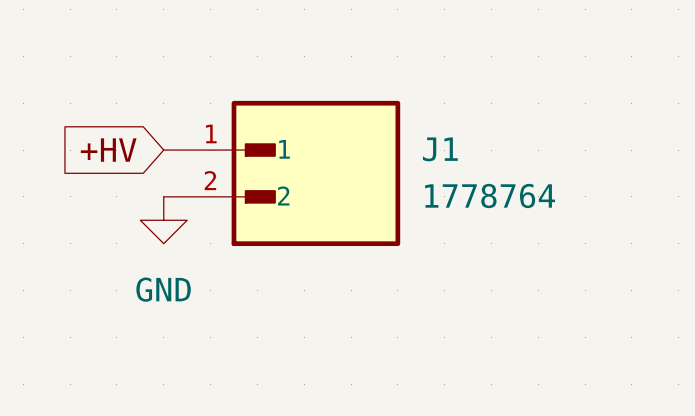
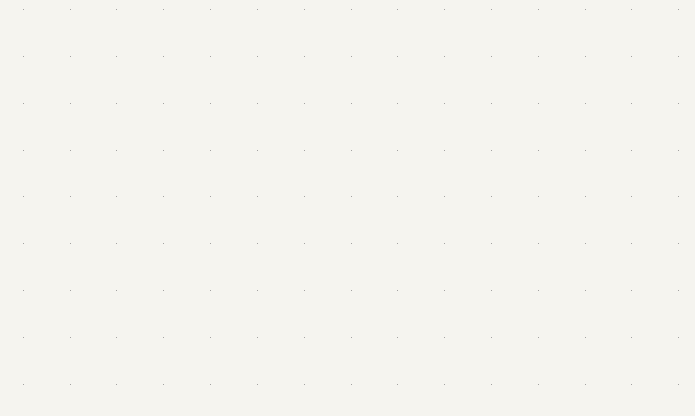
global label: +HV (108, 150) -> none
J1: 1778764 (281, 173) -> none
power symbol: GND (163, 220) -> none

